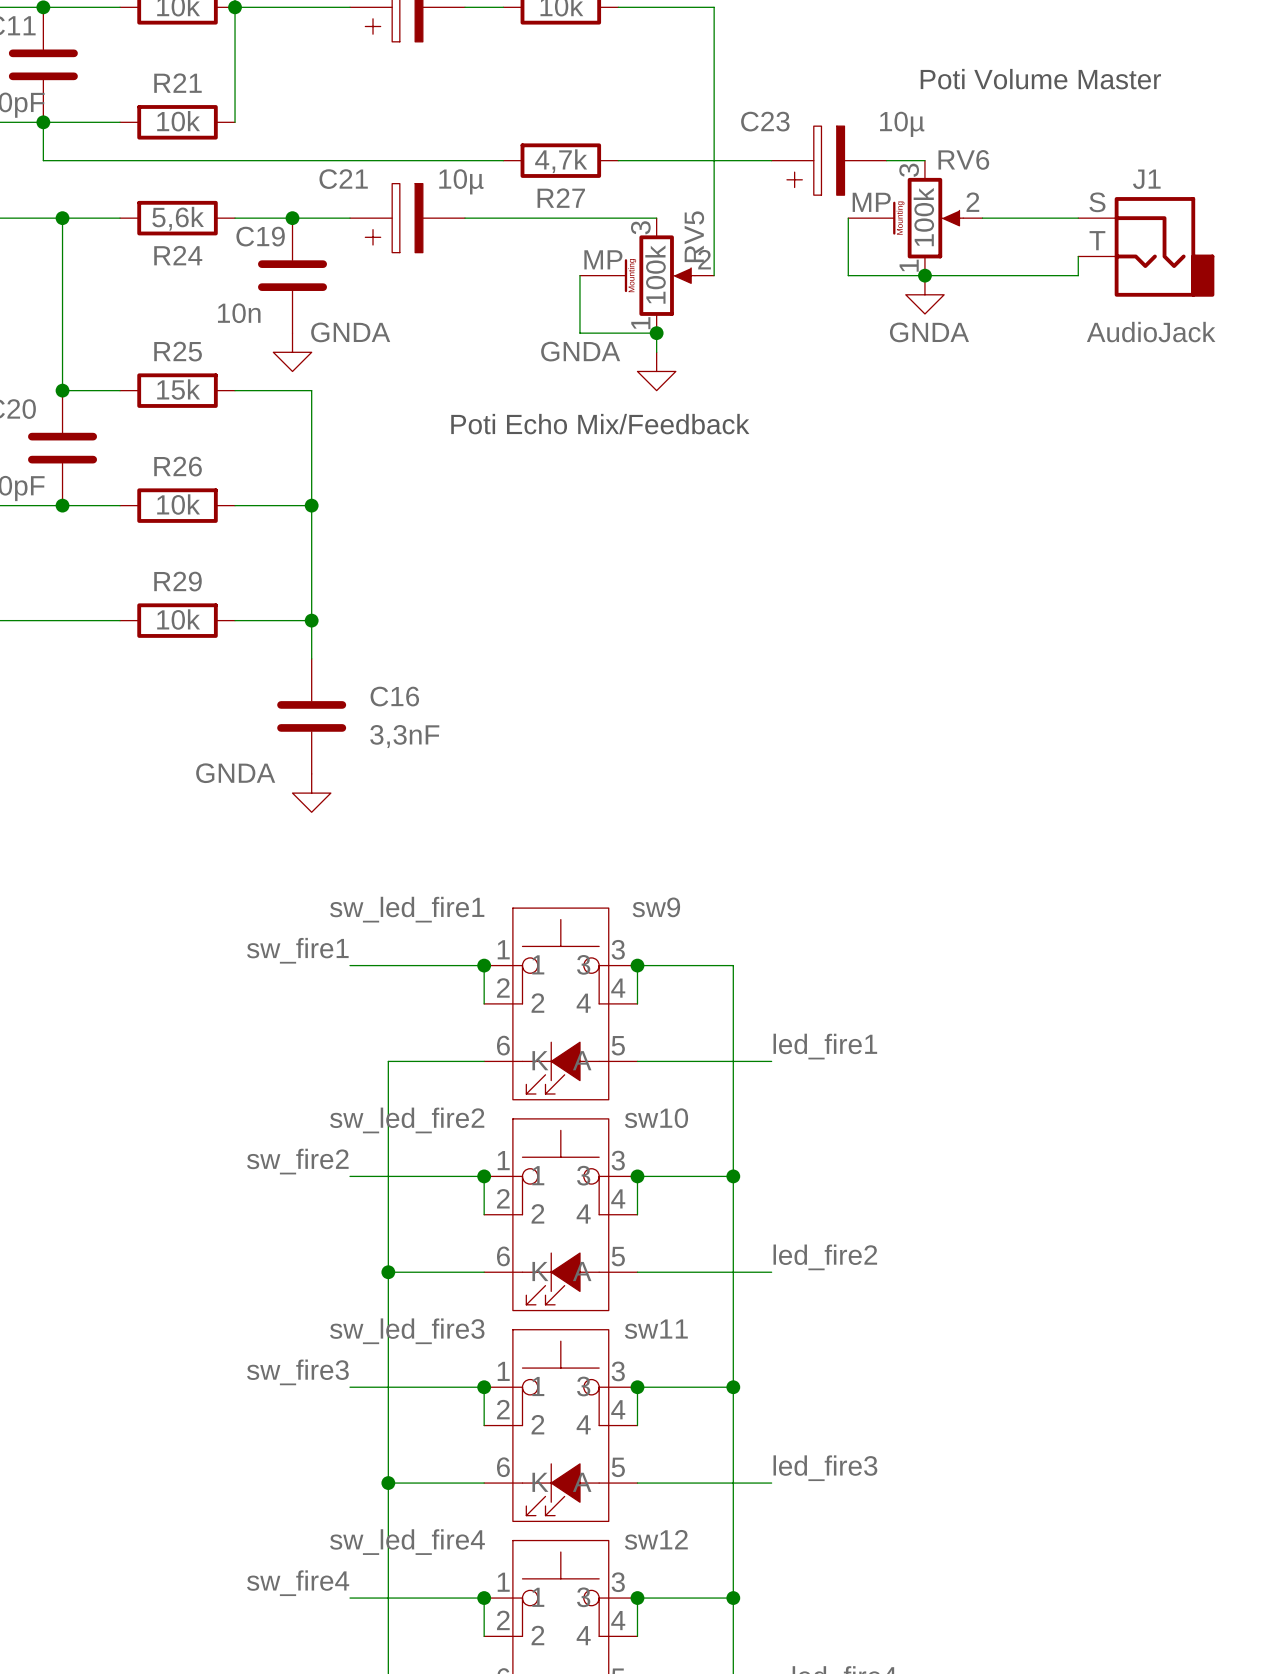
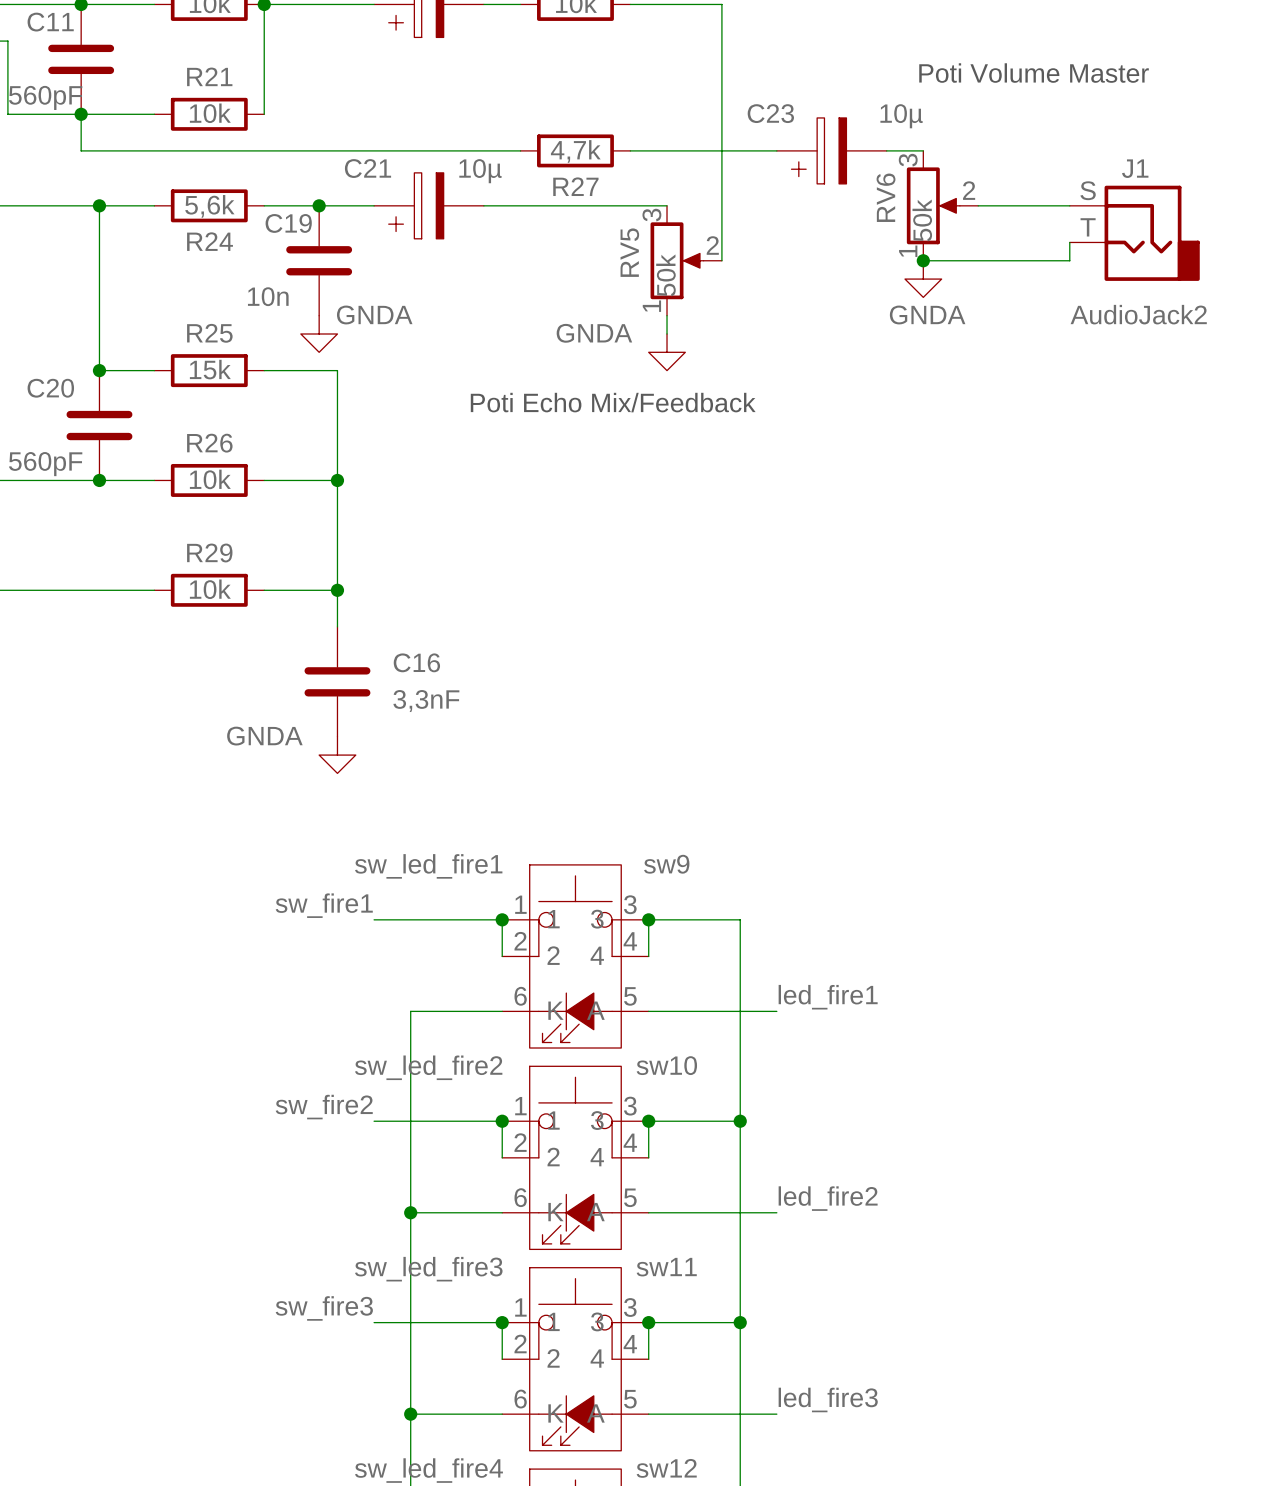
RV6 name position: RV6 (963, 159) -> RV6 (886, 197)
RV6 symbol: [848, 160, 983, 276] -> [906, 150, 979, 261]
RV6 value: 100k (923, 217) -> 50k (922, 220)
RV5 symbol: [579, 218, 715, 334] -> [650, 205, 722, 316]
wire: (848, 218) (848, 275) (924, 275) -> none
RV5 name position: RV5 (694, 236) -> RV5 (629, 252)
RV5 value: 100k (655, 274) -> 50k (665, 275)
wire: (579, 275) (579, 333) (656, 333) -> none
J1 value: AudioJack (1151, 332) -> AudioJack2 (1138, 314)
junction: (656, 333) -> none

